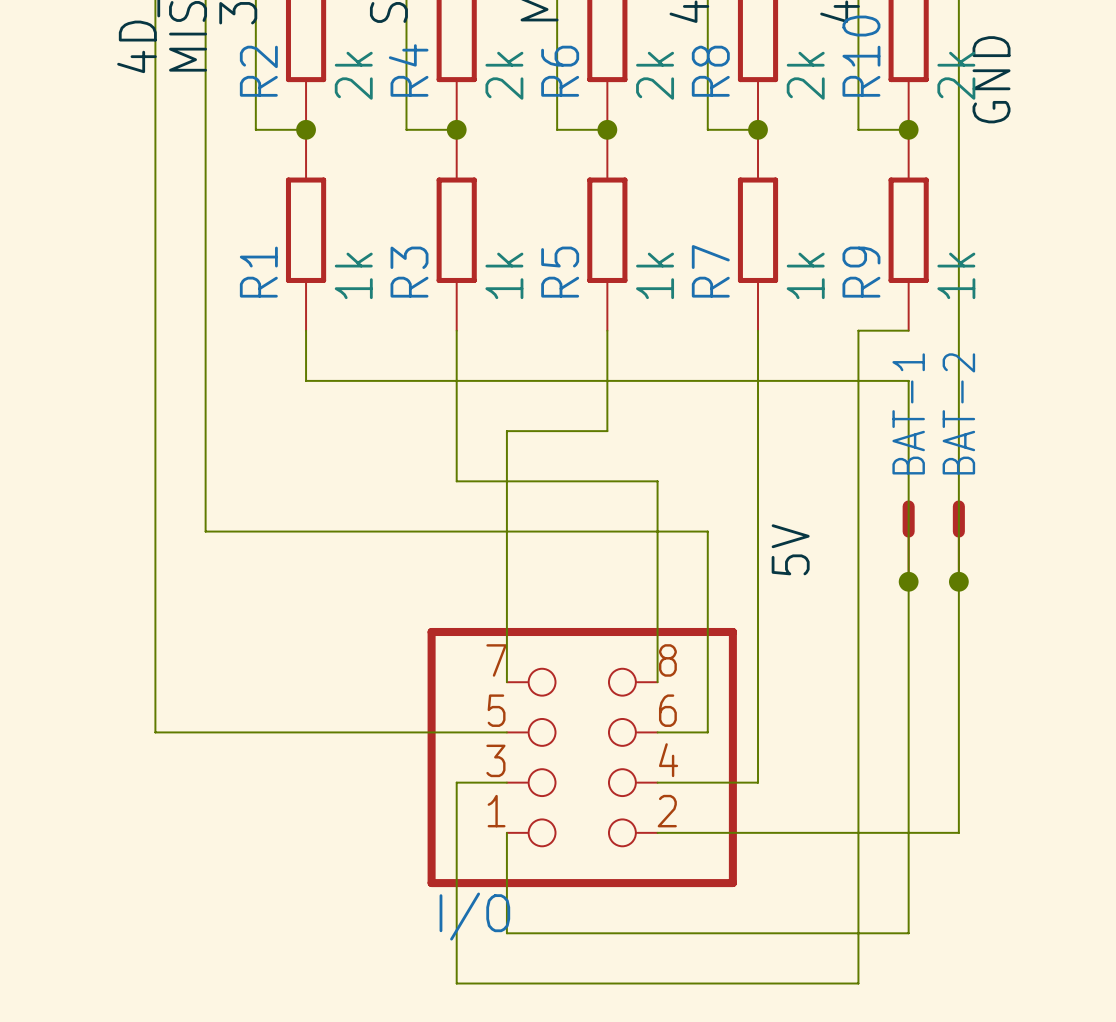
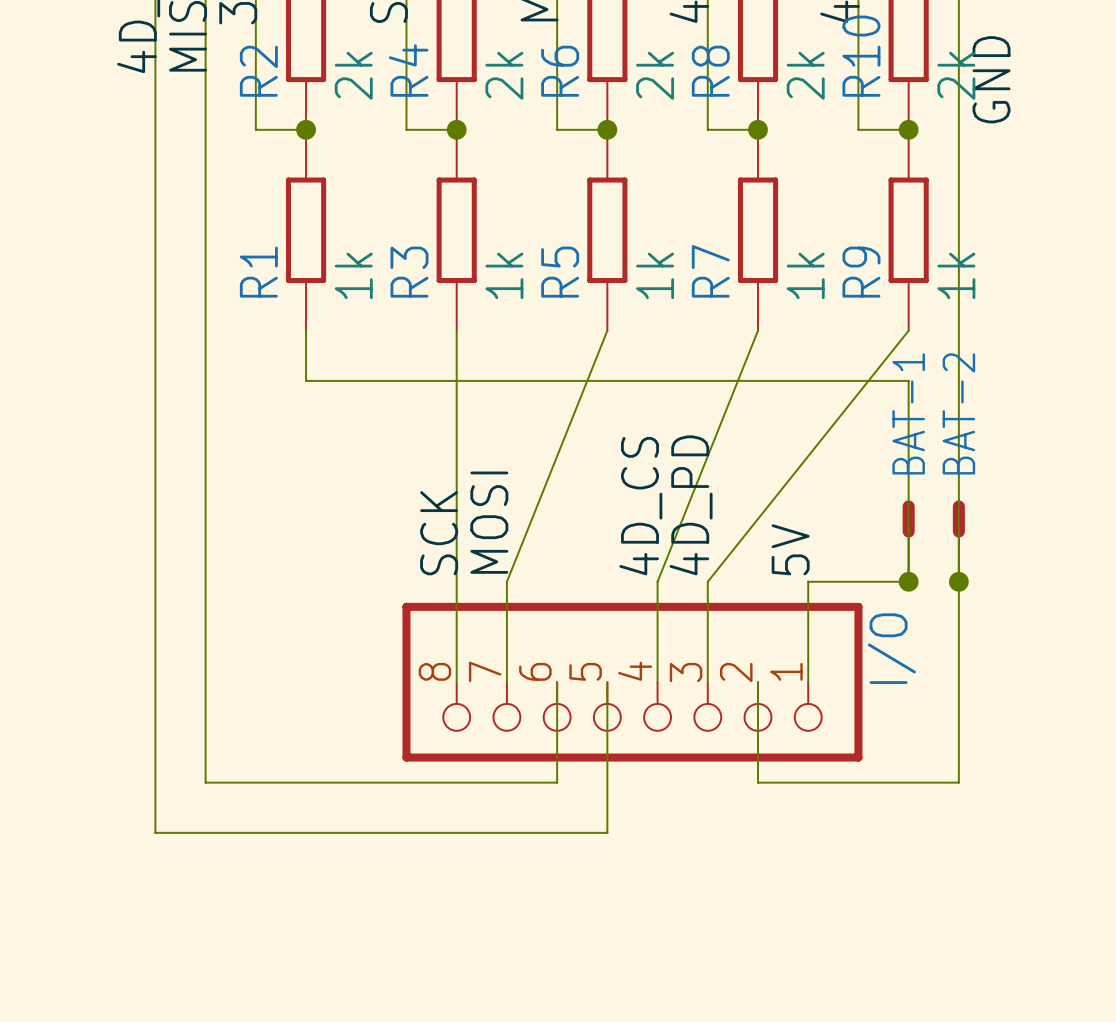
wire: (607, 330) (607, 431) (506, 431) (506, 581) -> (607, 330) (506, 581)
wire: (758, 330) (758, 682) -> (758, 330) (657, 581)
wire: (908, 330) (858, 330) (858, 983) (456, 983) (456, 782) -> (908, 330) (707, 581)
wire: (456, 481) (657, 481) (657, 581) -> (456, 481) (456, 682)
label: none -> 4D_PD (691, 505)
label: none -> 4D_CS (640, 506)
label: none -> MOSI (489, 522)
wire: (205, 531) (707, 531) (707, 581) -> (205, 531) (205, 782) (456, 782)
label: none -> SCK (439, 533)
wire: (908, 581) (908, 933) (506, 933) (506, 832) -> (908, 581) (808, 581) (808, 682)
wire: none -> (557, 682) (557, 782) (506, 782)
I/O: none -> (632, 682)
wire: (707, 682) (707, 732) (657, 732) -> none
wire: (155, 732) (506, 732) -> (155, 732) (155, 832) (607, 832) (607, 682)
I/O: (582, 757) -> none
wire: (657, 782) (758, 782) -> none
wire: (958, 782) (958, 832) (657, 832) -> (958, 782) (758, 782)

